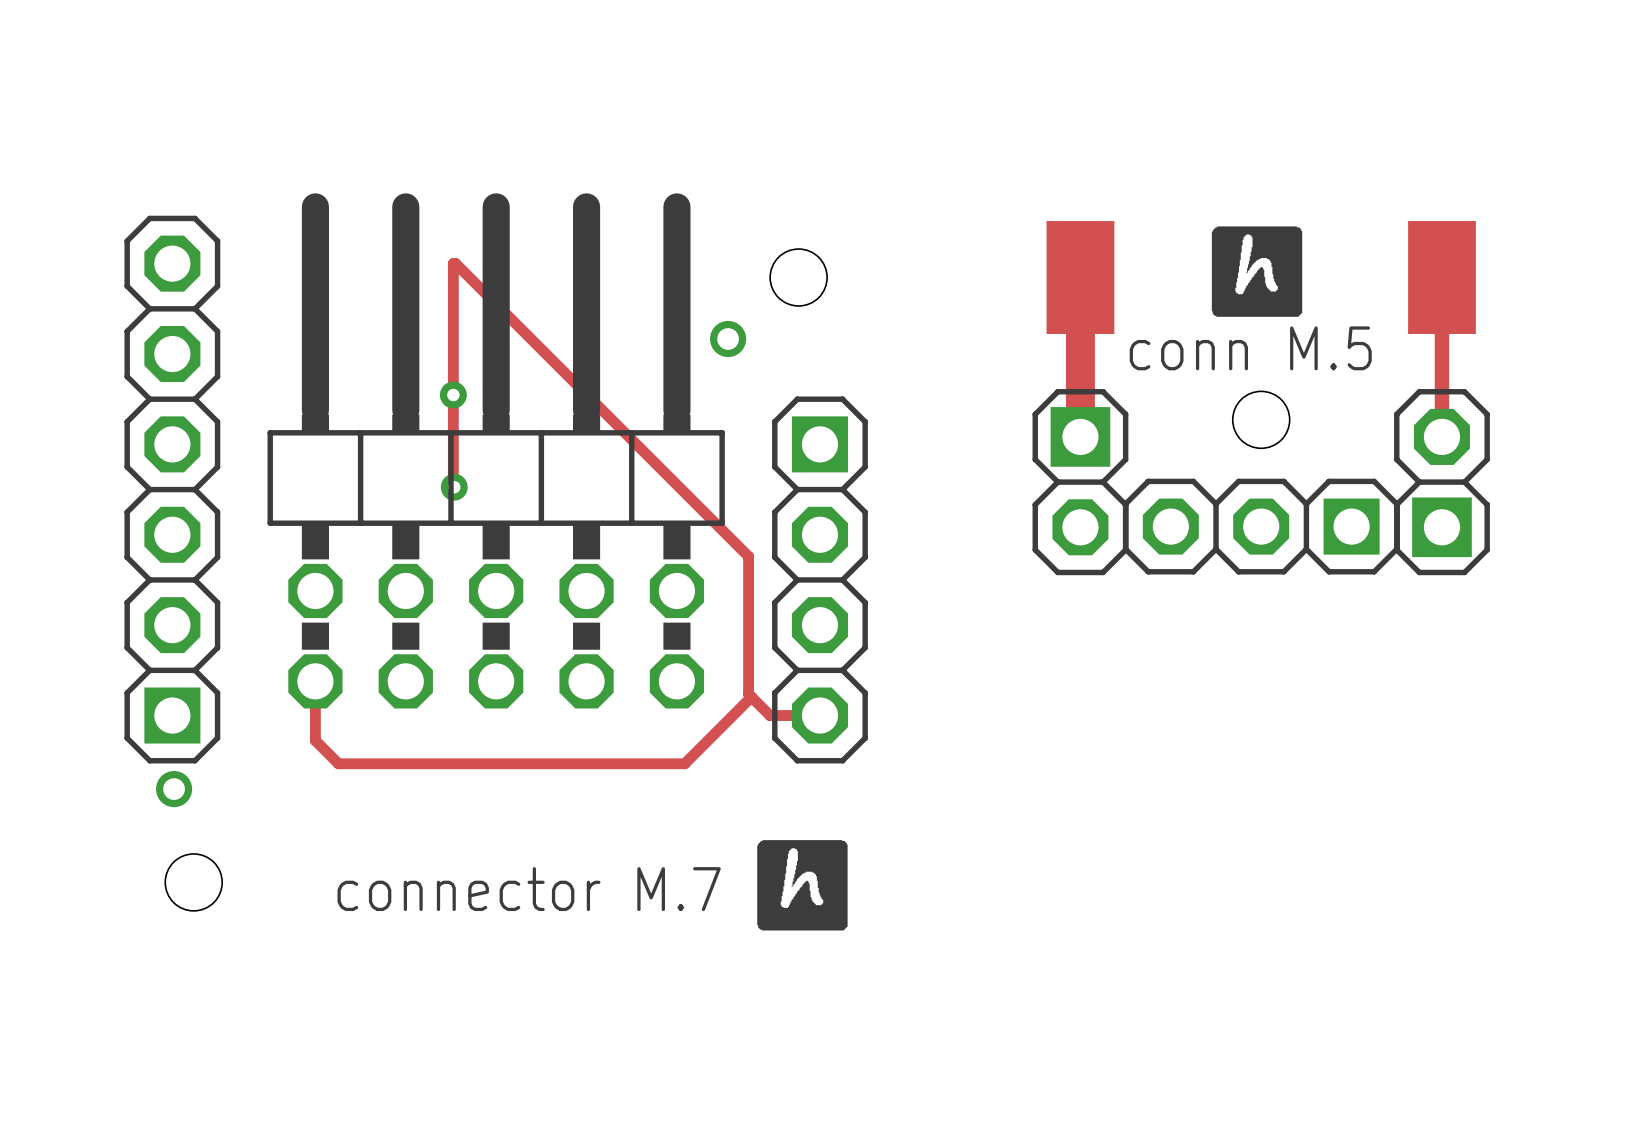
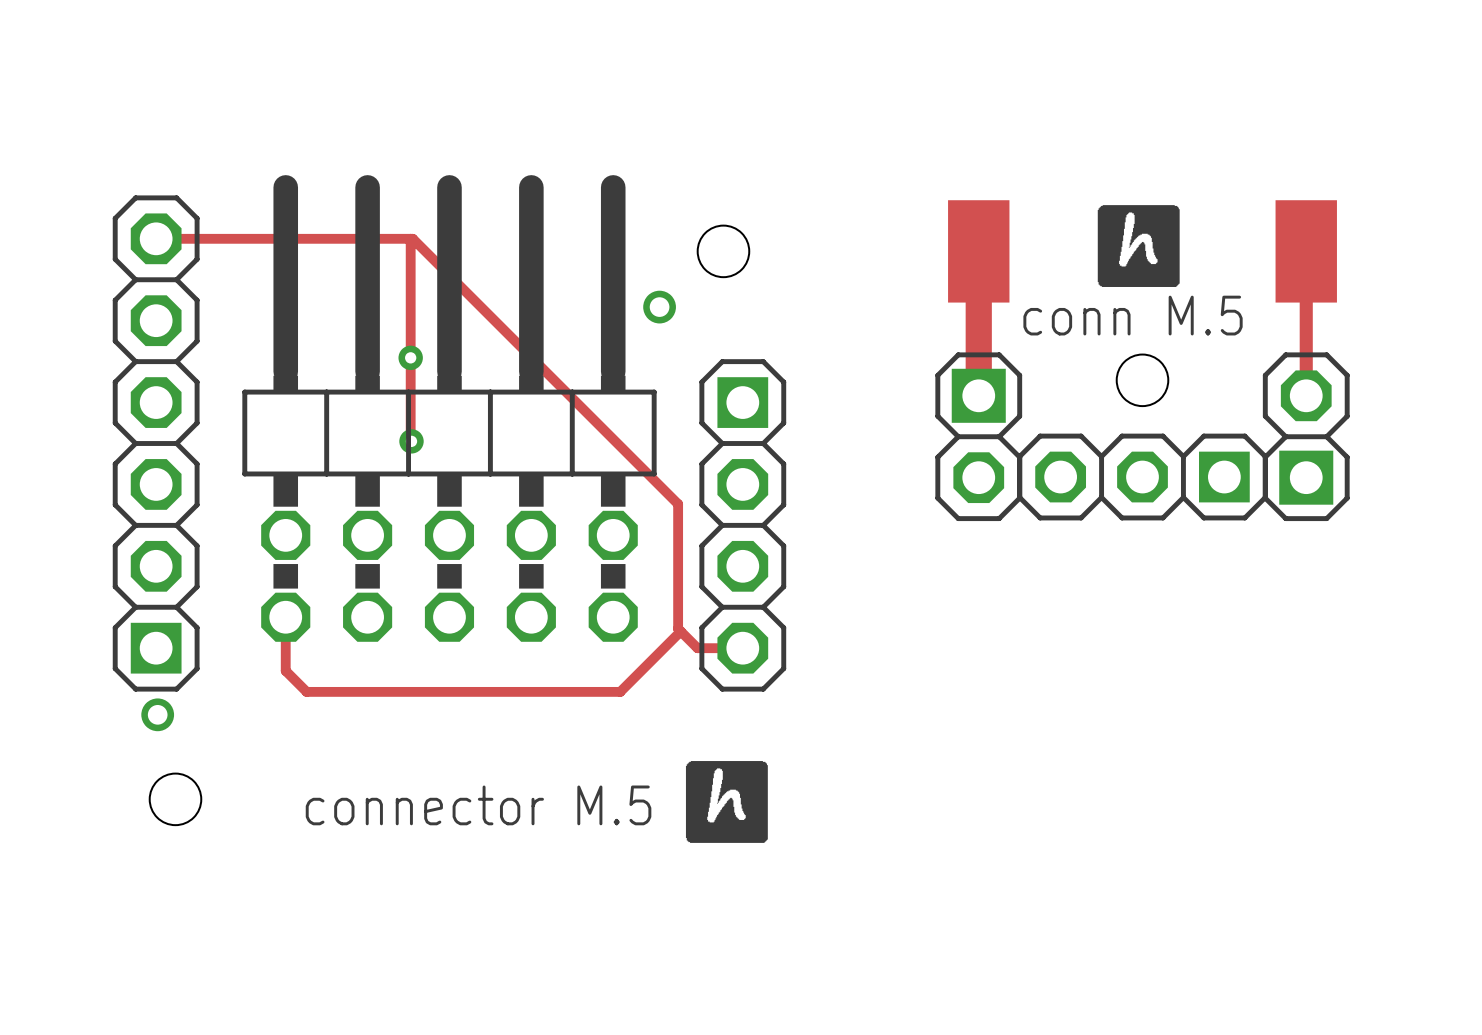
track: none -> (157, 238) (156, 238) (410, 238)
text: connector M.7 (529, 889) -> connector M.5 (478, 805)

